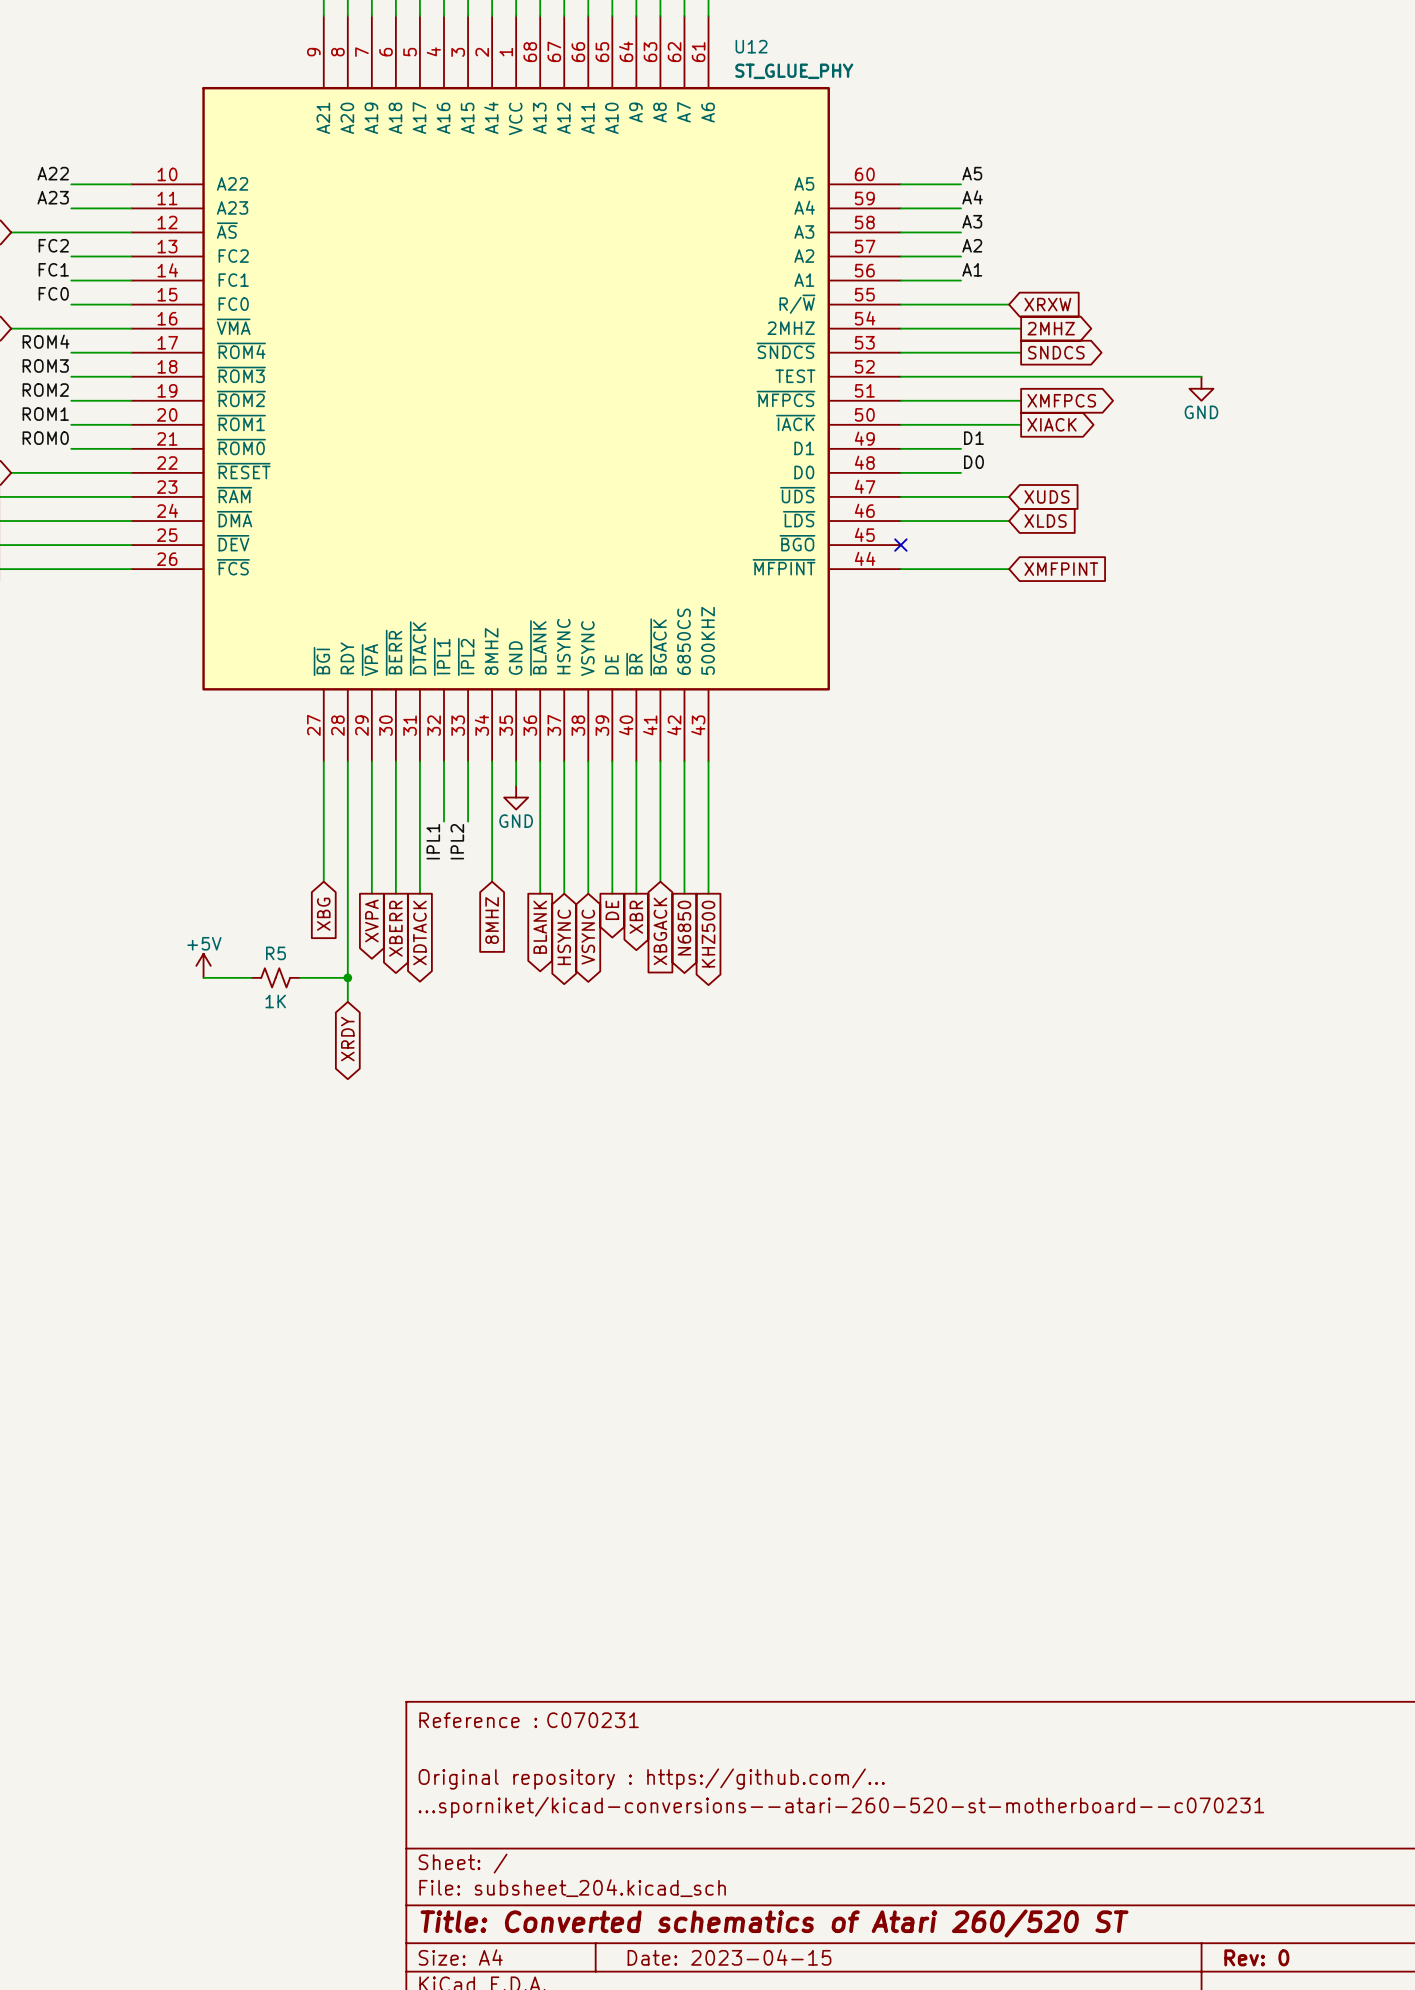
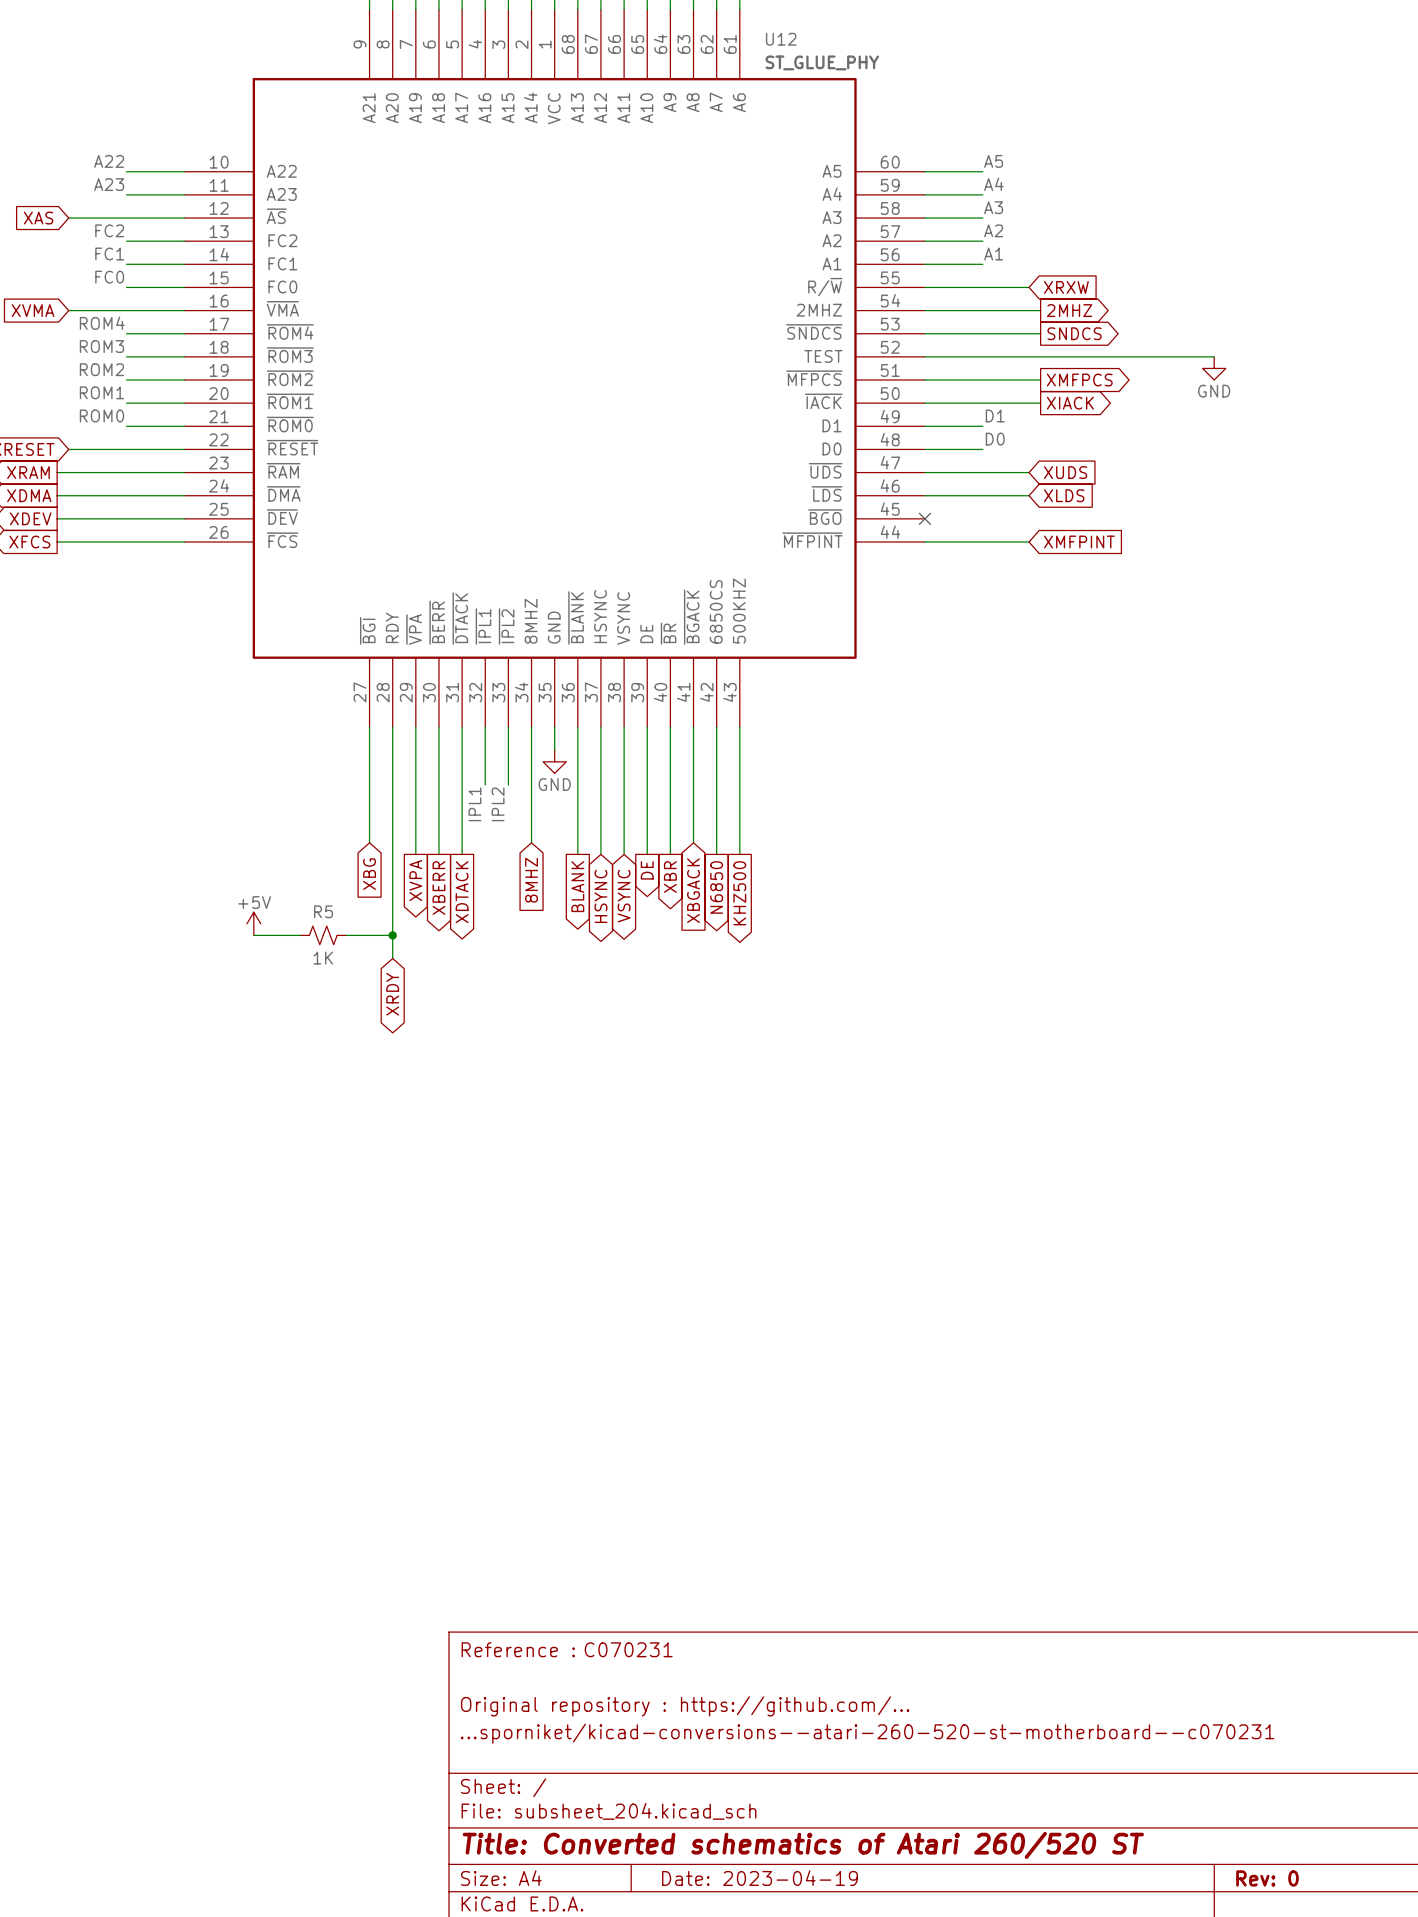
title block: Date: 2023-04-15 (729, 1957) -> Date: 2023-04-19 (759, 1878)

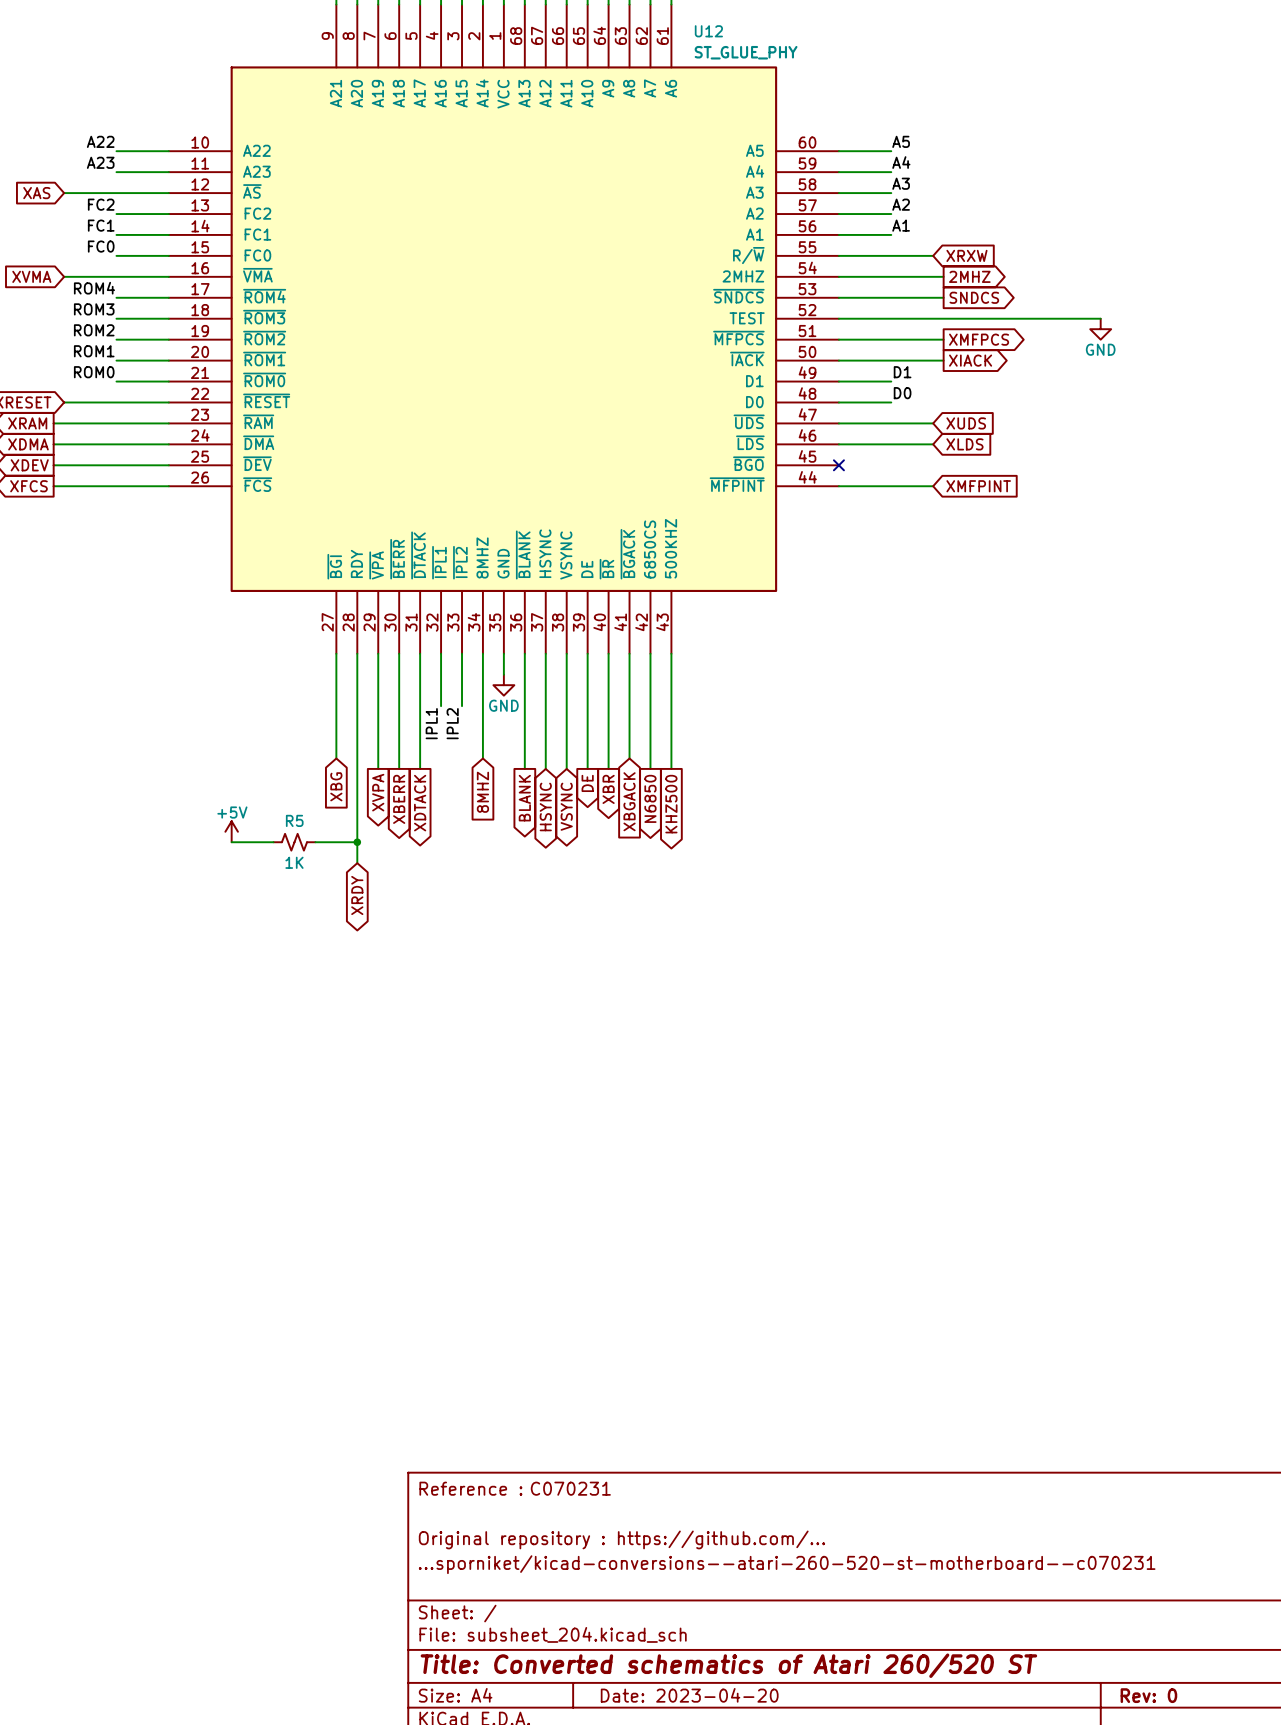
title block: Date: 2023-04-19 (759, 1878) -> Date: 2023-04-20 (689, 1695)

